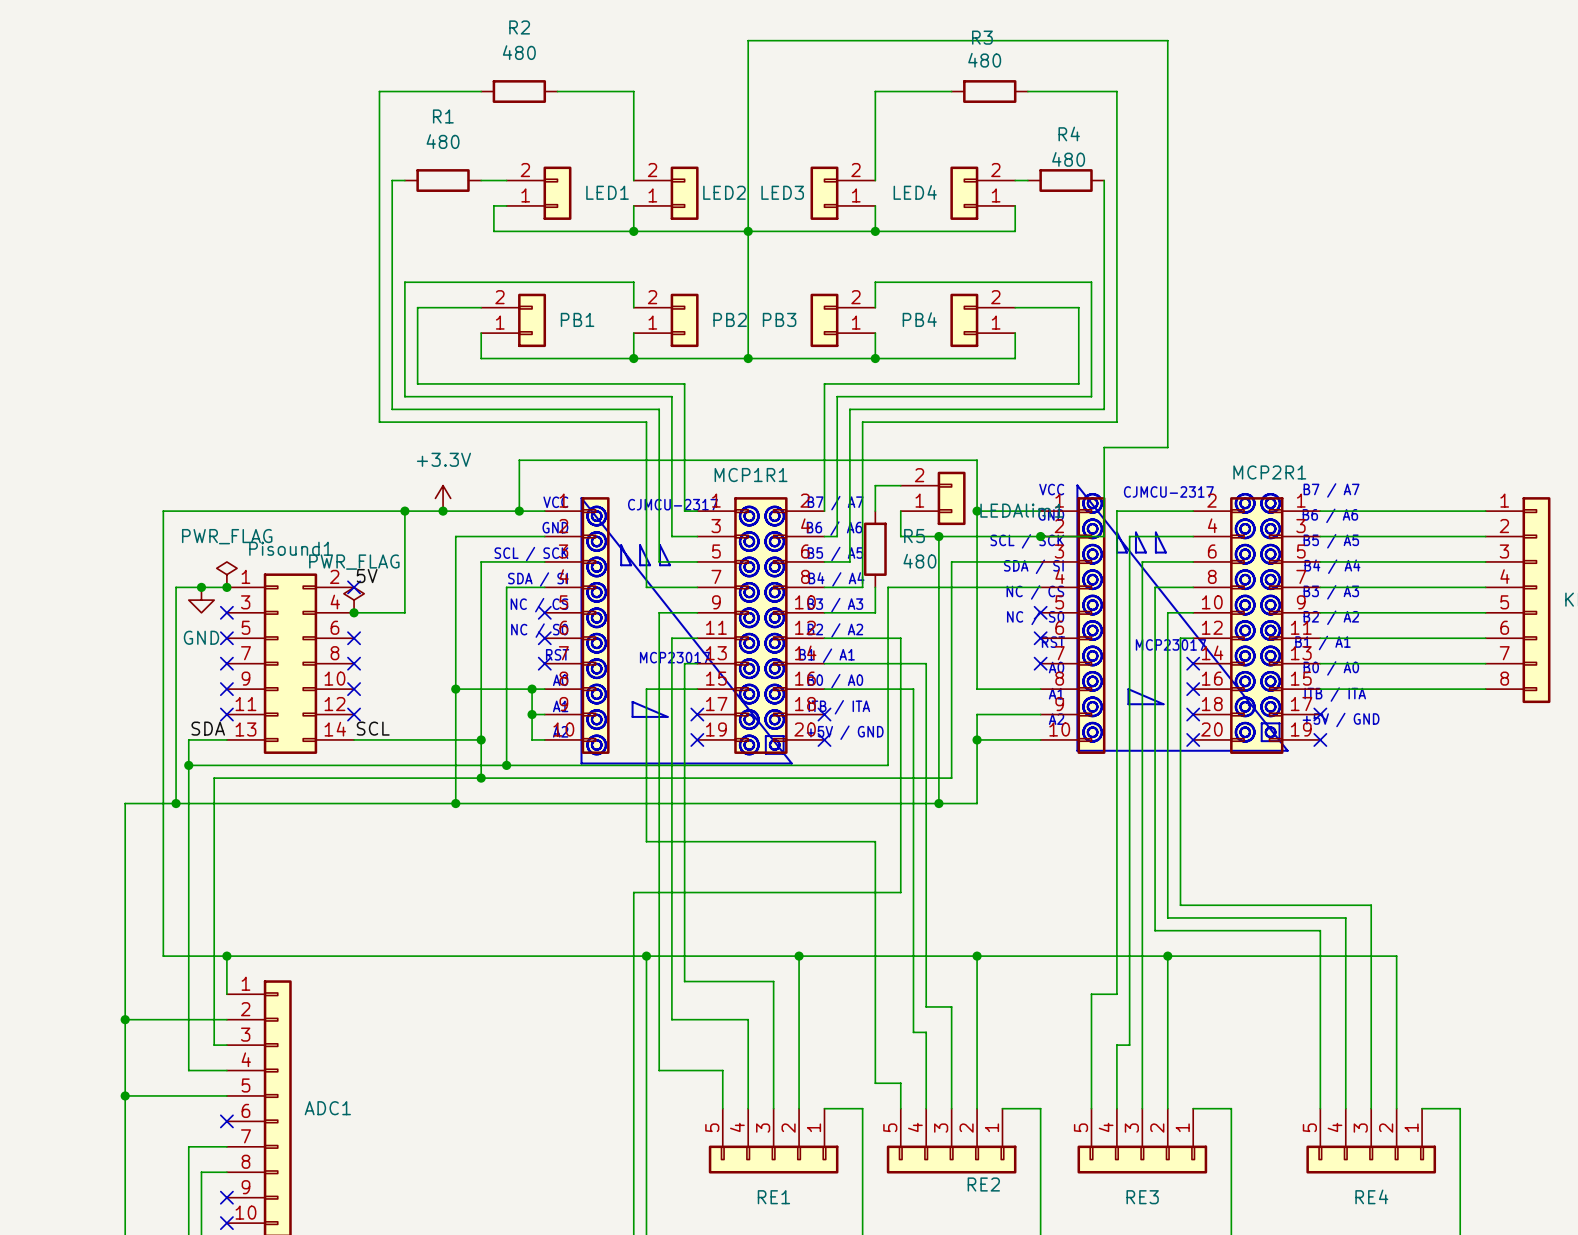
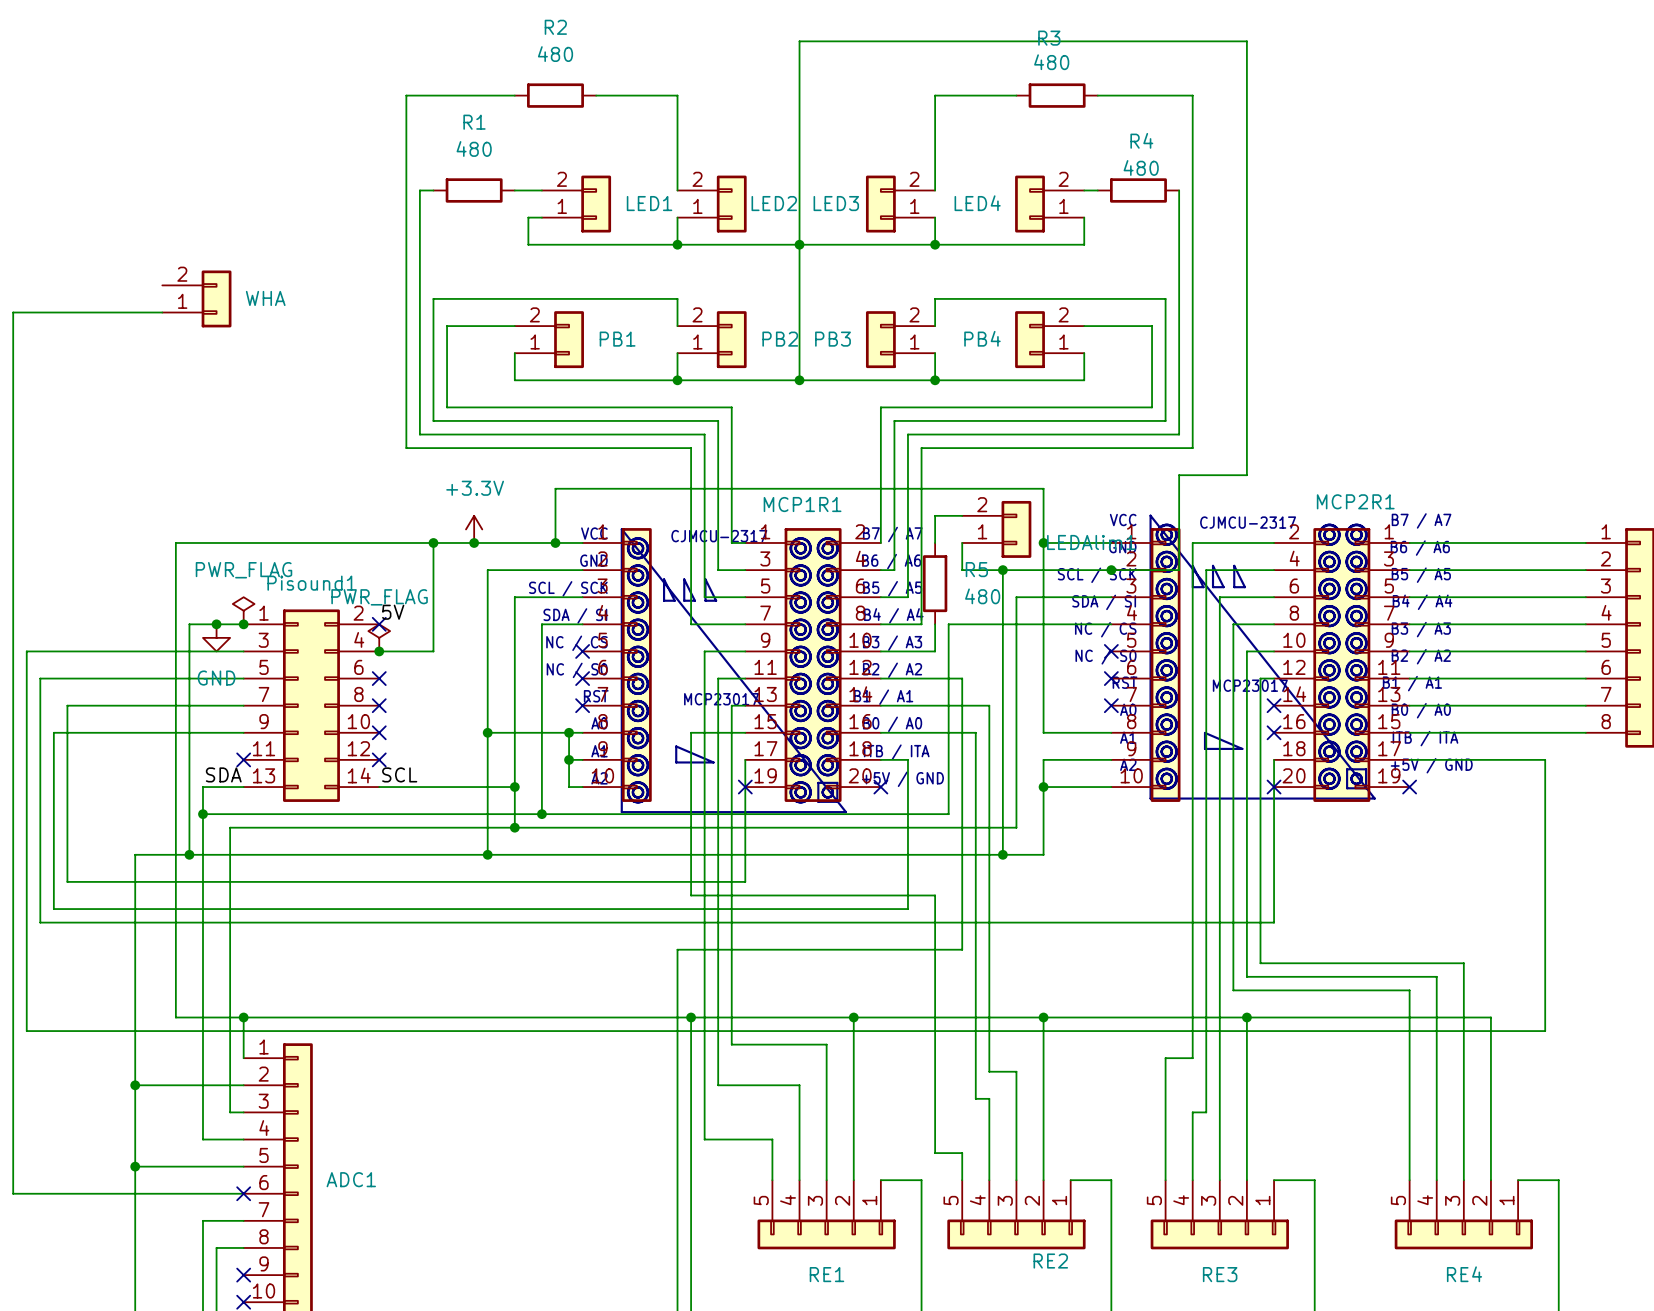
WHA: none -> (196, 298)
wire: none -> (162, 312) (13, 312) (13, 1193) (243, 1193)
wire: none -> (243, 651) (26, 651) (26, 1031) (1545, 1031) (1545, 759) (1409, 759)
no-connect mark: (226, 612) -> none
wire: none -> (243, 678) (40, 678) (40, 922) (1274, 922) (1274, 759)
no-connect mark: (226, 638) -> none
wire: none -> (243, 705) (67, 705) (67, 881) (745, 881) (745, 759)
no-connect mark: (226, 663) -> none
wire: none -> (243, 732) (53, 732) (53, 909) (907, 909) (907, 759) (880, 759)
no-connect mark: (226, 689) -> none
no-connect mark: (697, 714) -> none
no-connect mark: (824, 714) -> none
no-connect mark: (1193, 714) -> none
no-connect mark: (1320, 714) -> none

